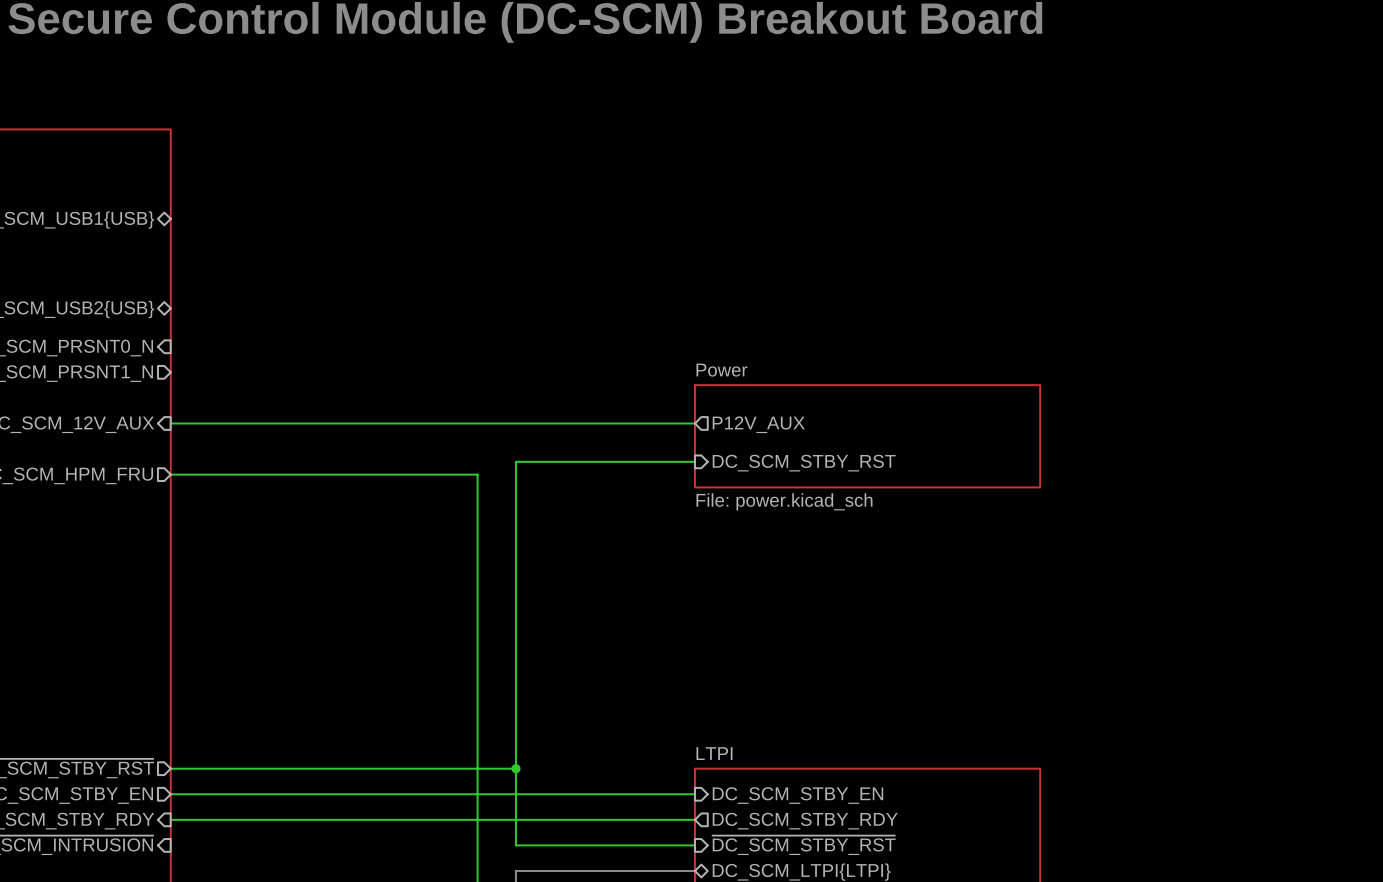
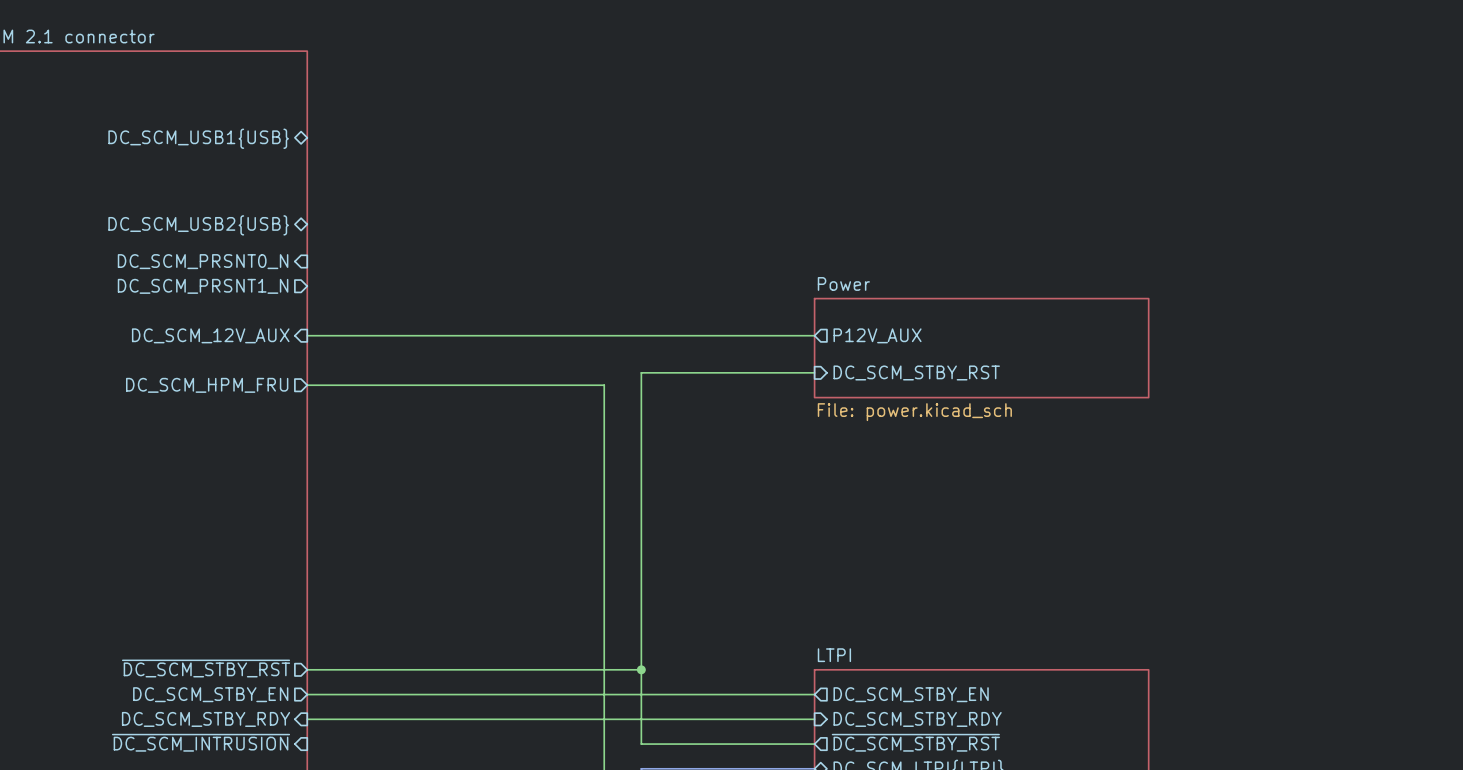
sheet pin shape: input (797, 795) -> output (911, 694)
sheet pin shape: output (805, 821) -> input (917, 719)
sheet pin shape: input (804, 845) -> output (915, 742)

